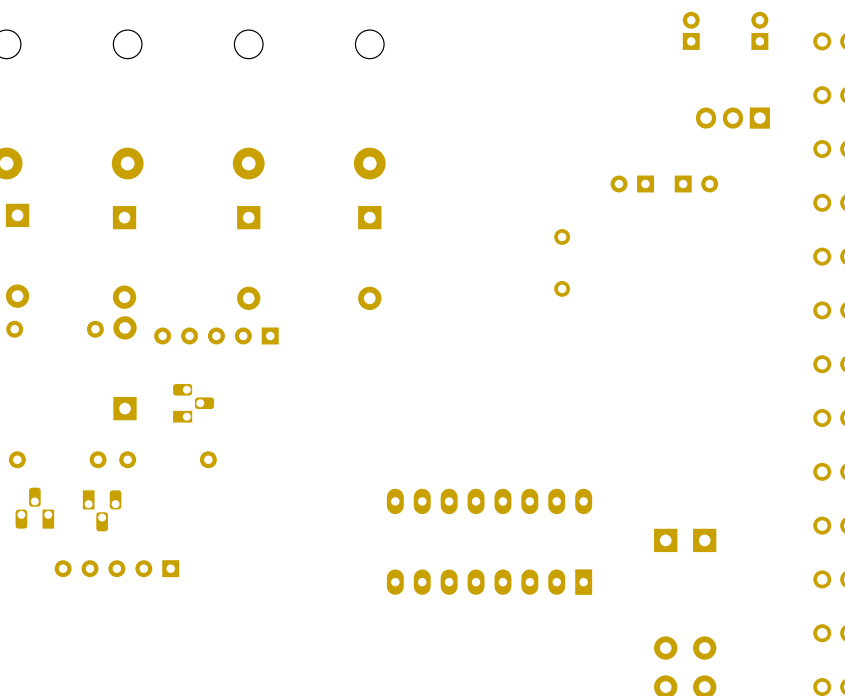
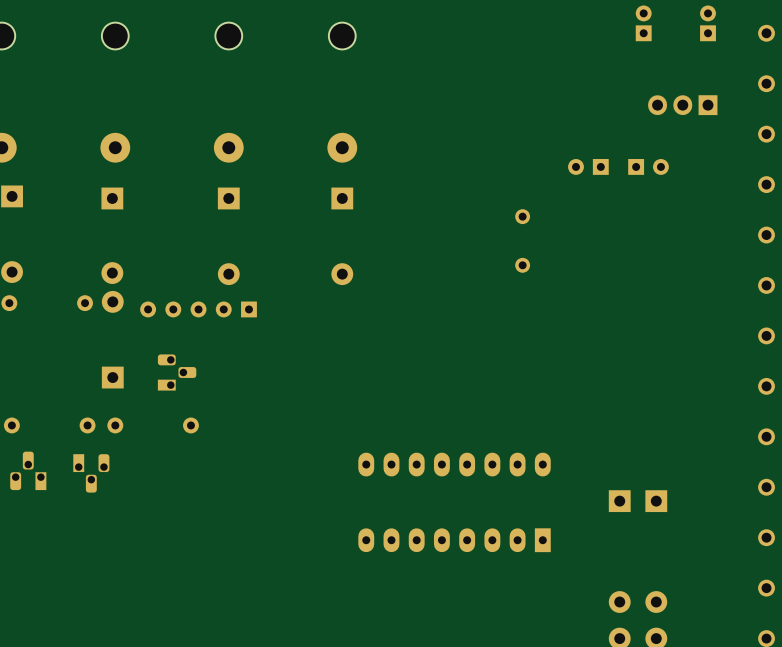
part: (116, 568) -> none

